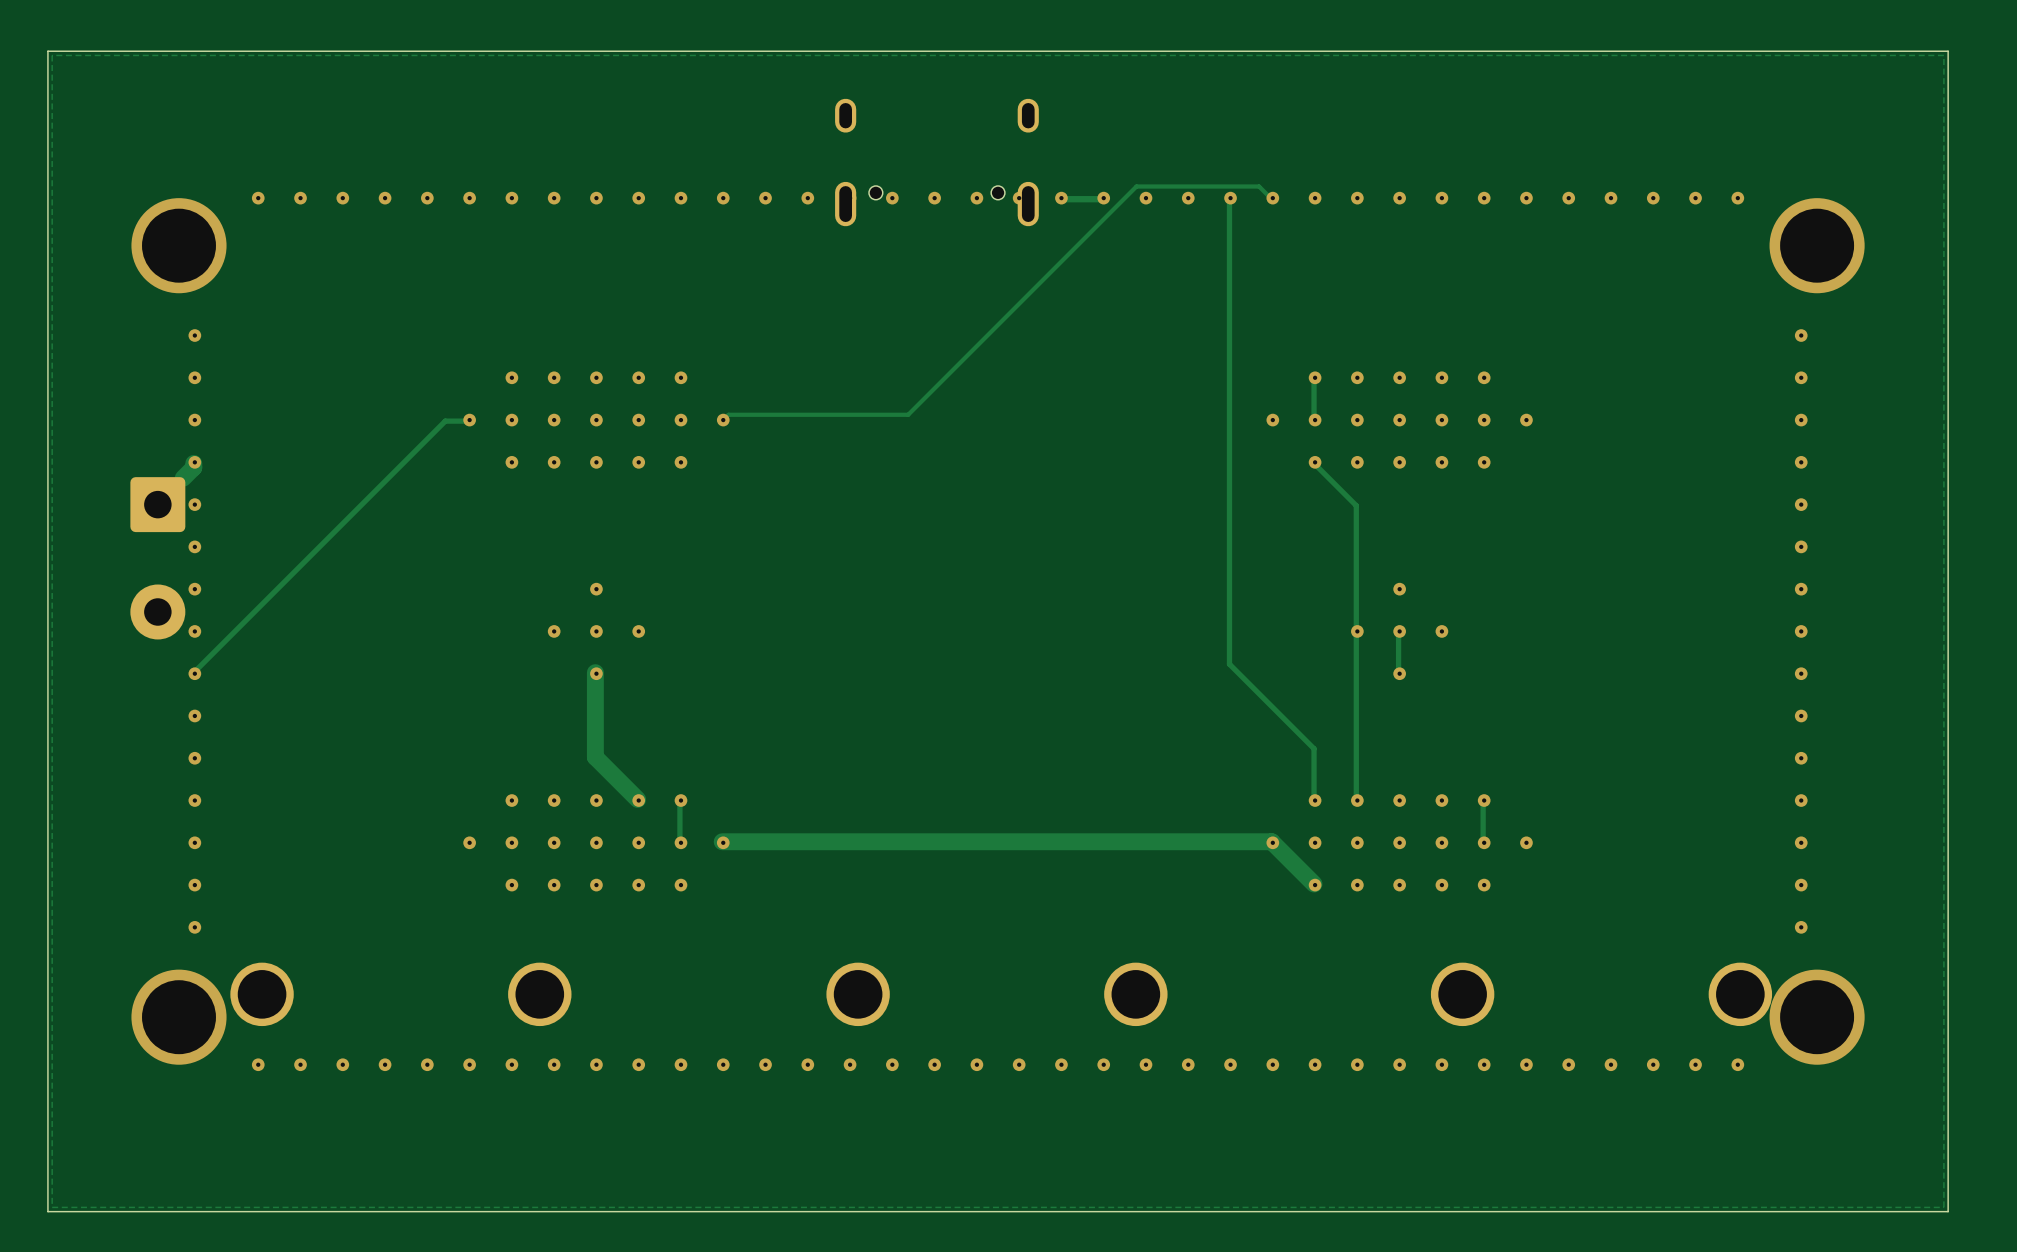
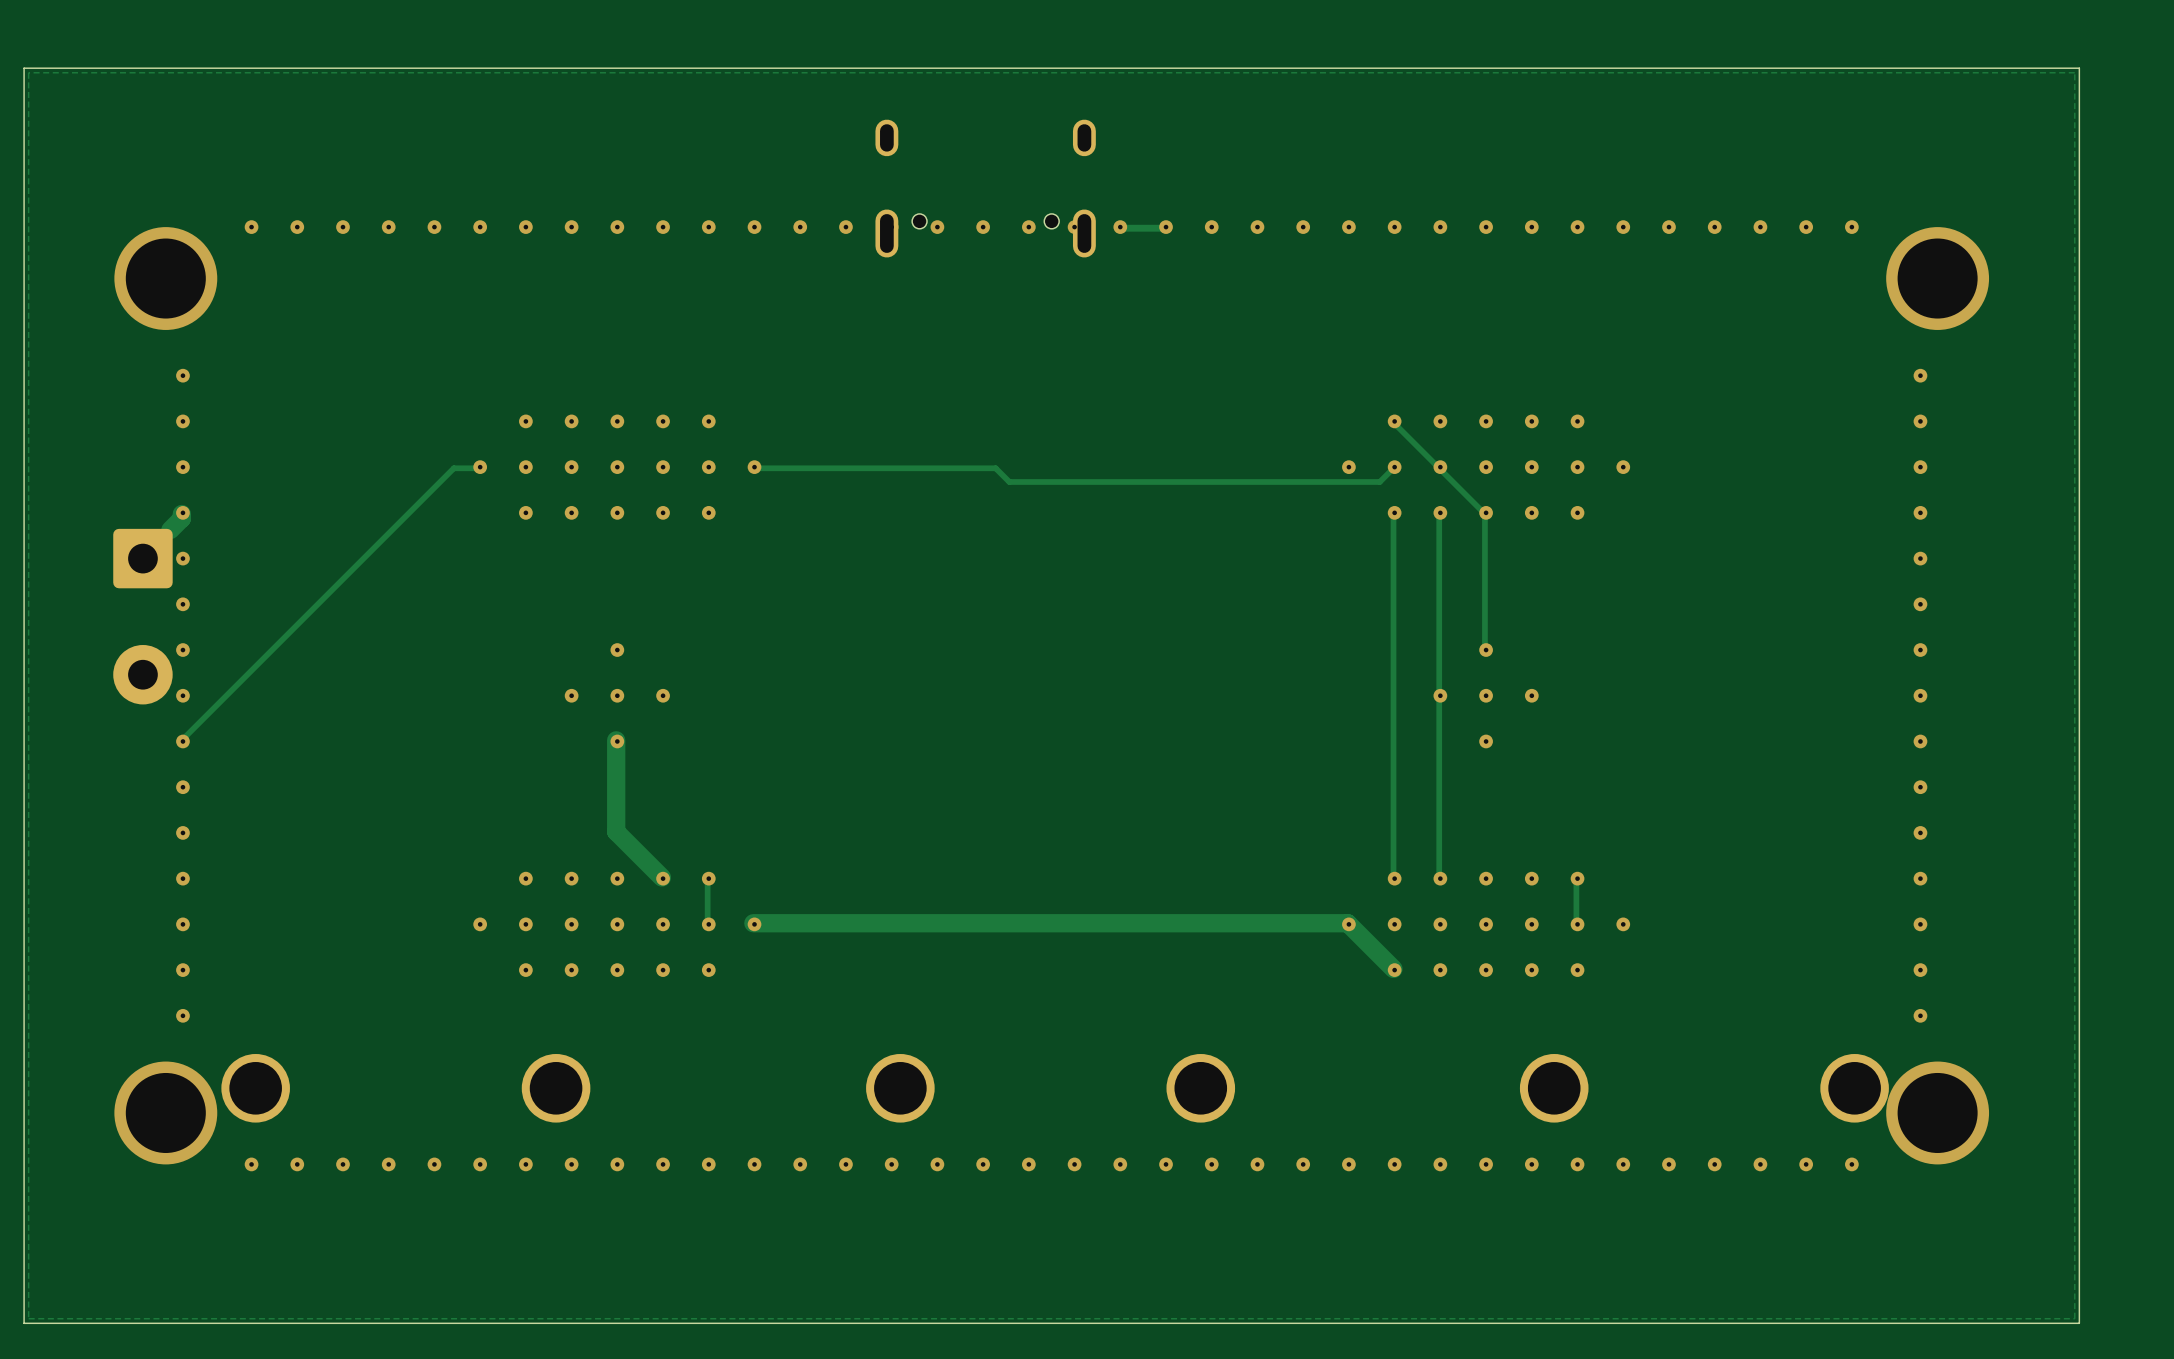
track: (1229, 199) (1229, 664) (1314, 748) -> (1393, 514) (1393, 822)
track: (1271, 199) (1259, 186) (1136, 186) (908, 414) (728, 414) (722, 421) -> (1393, 468) (1379, 481) (1009, 481) (995, 468) (753, 468)
track: (1314, 378) (1314, 421) -> (1393, 422) (1484, 514)
track: (1314, 463) (1356, 505) -> (1439, 514) (1439, 559)
track: none -> (1484, 514) (1484, 651)
track: (1398, 630) (1398, 672) -> none

